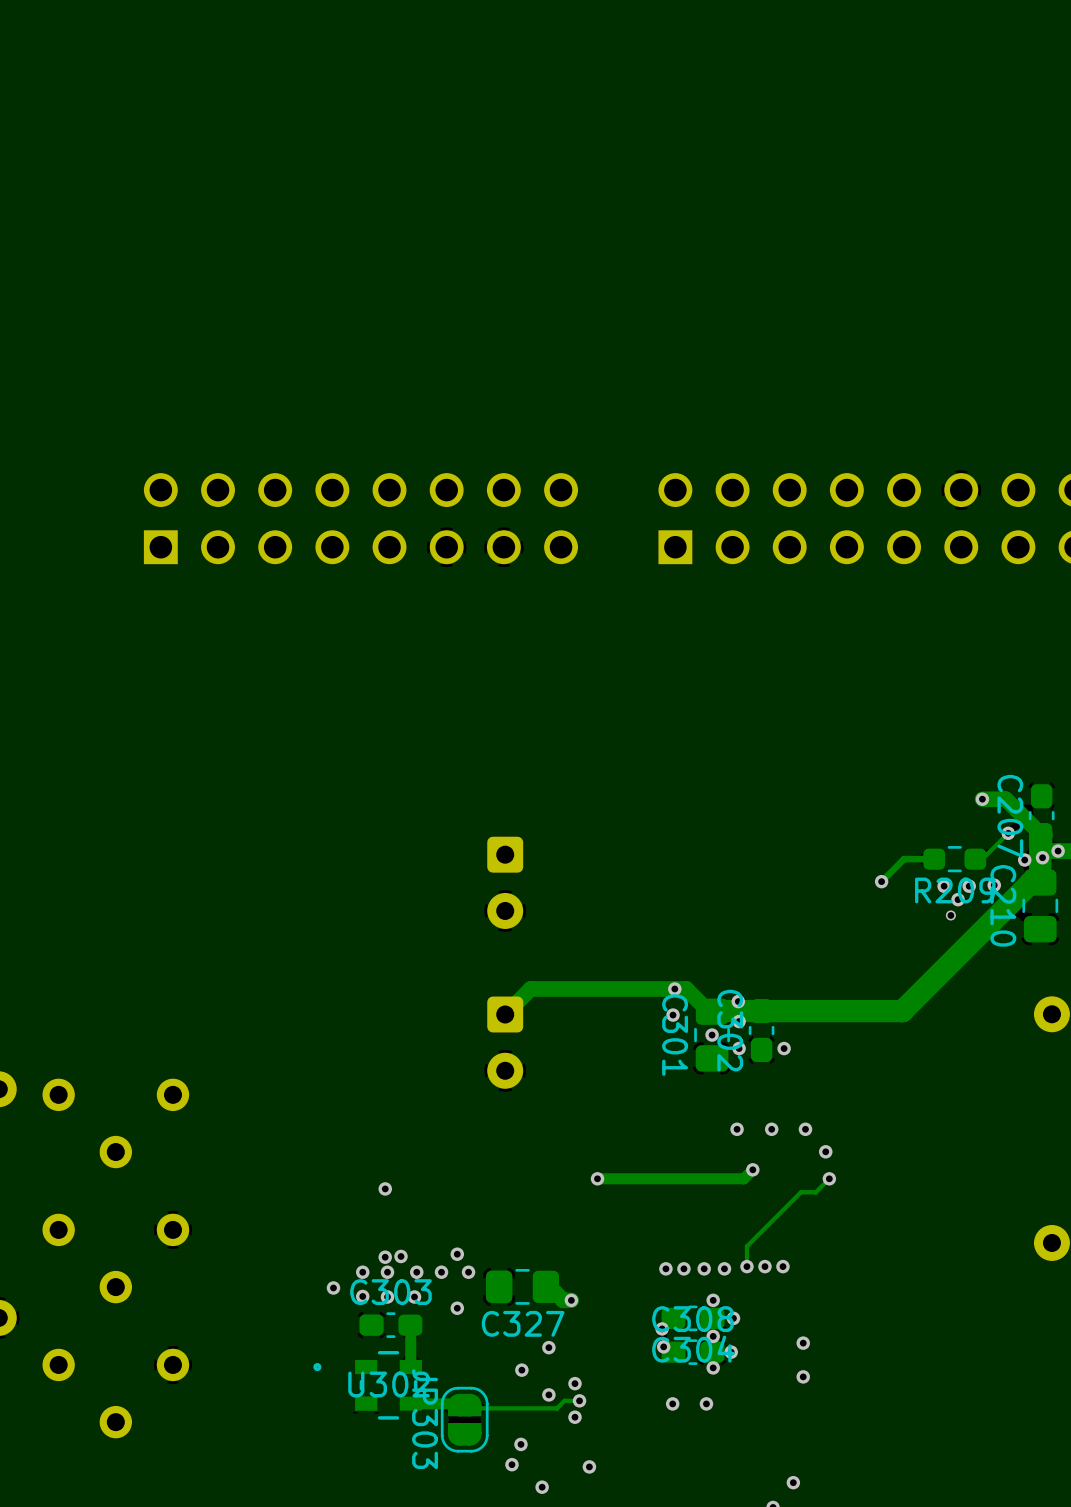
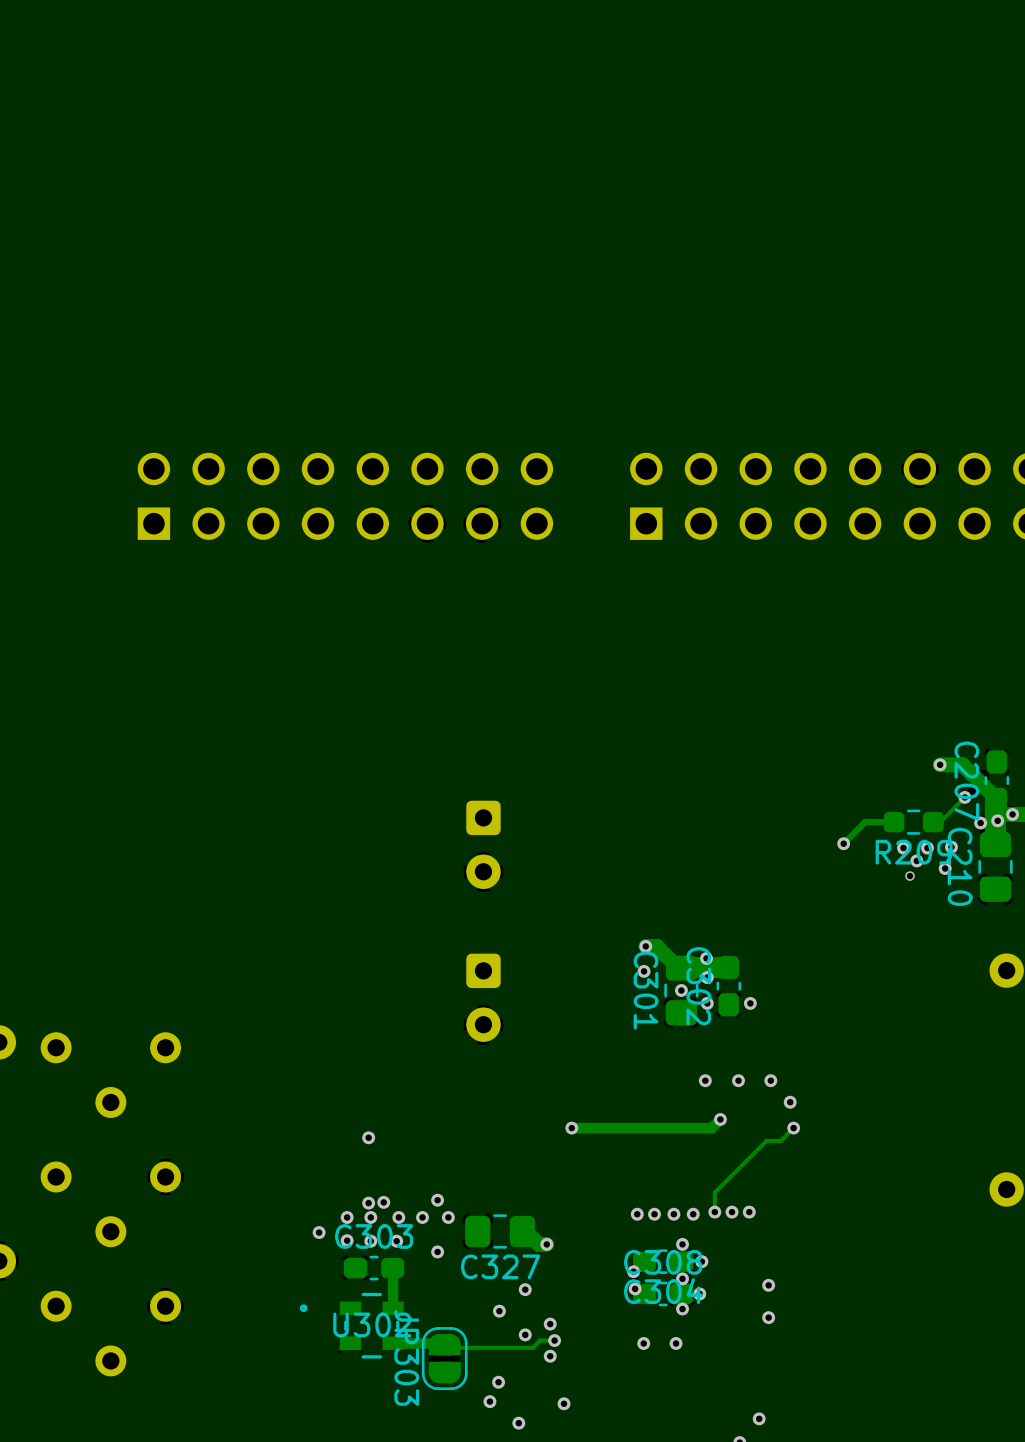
track: (1040, 882) (1031, 882) (902, 1011) (761, 1011) -> none
via: none -> (945, 868)
track: (674, 989) (530, 989) (505, 1014) -> none

